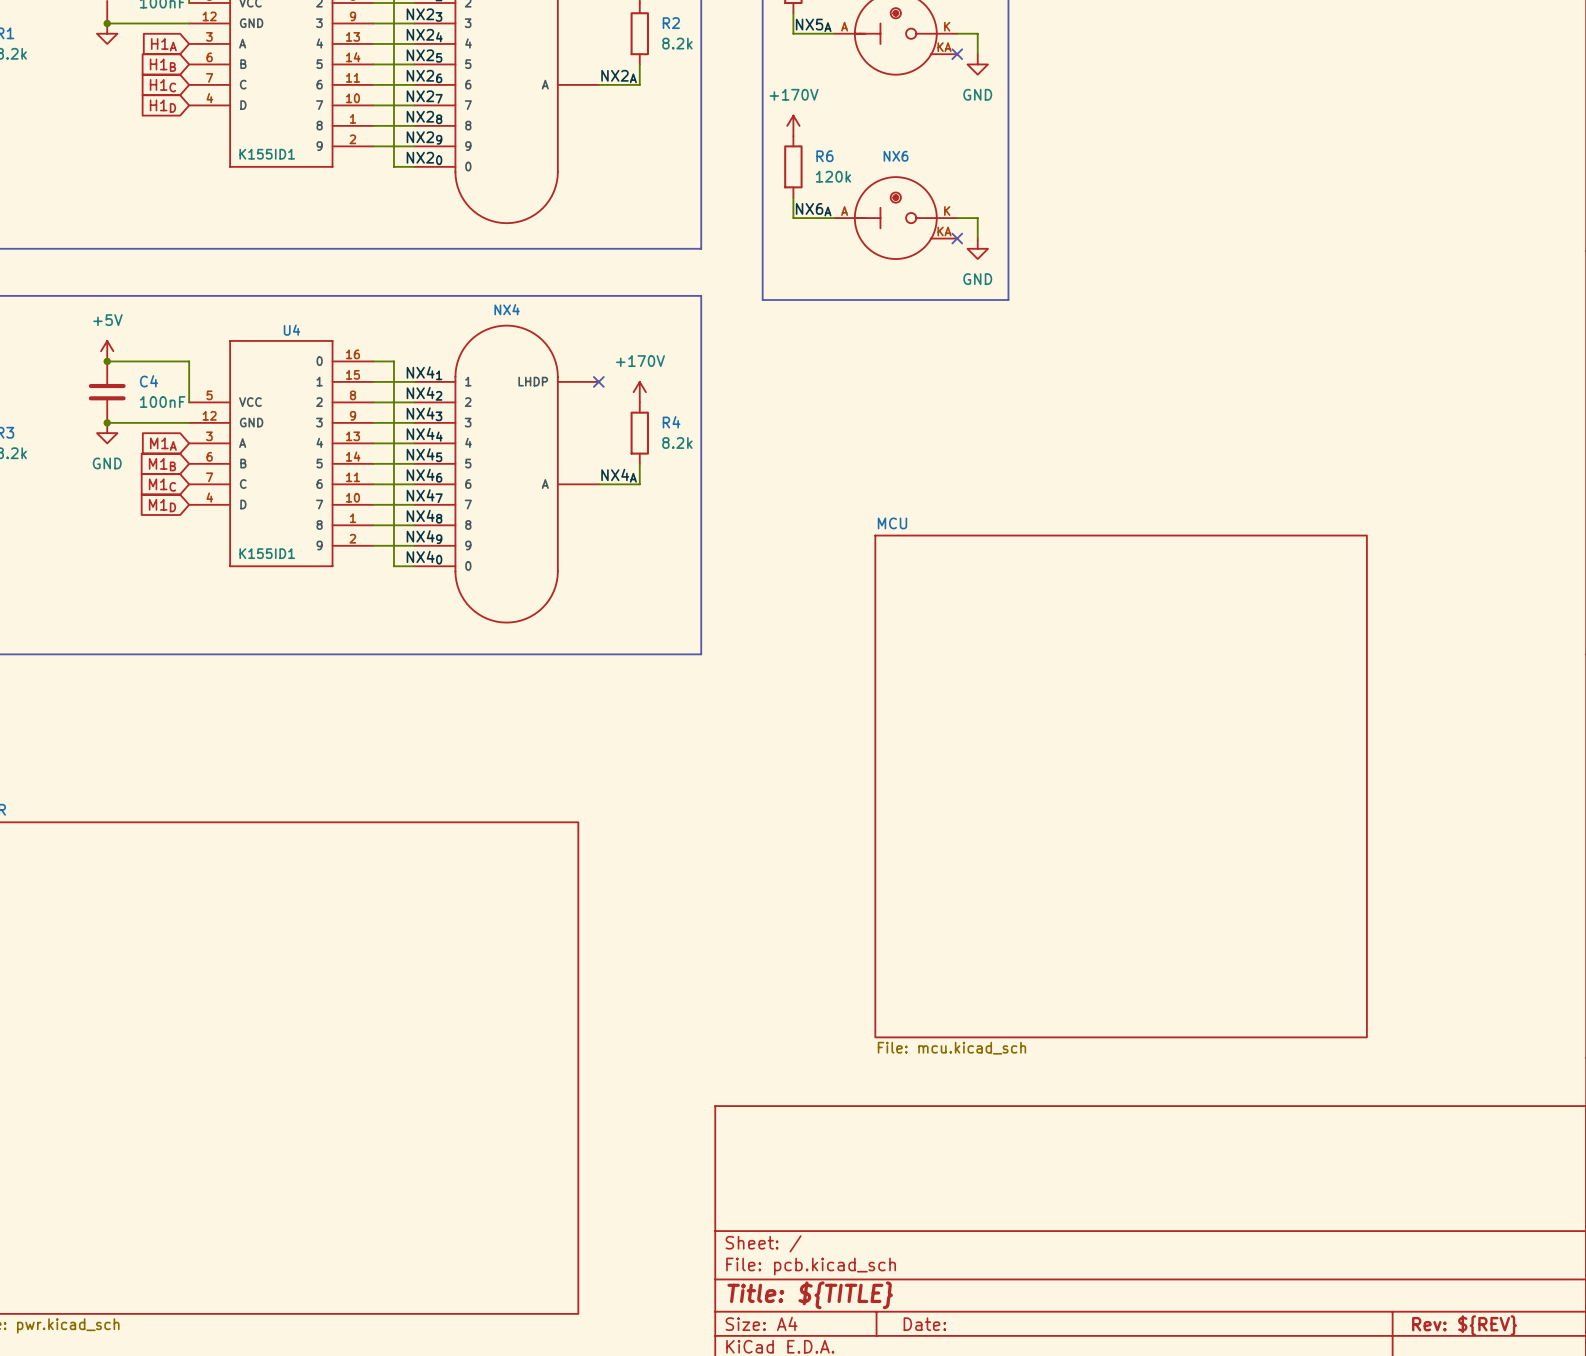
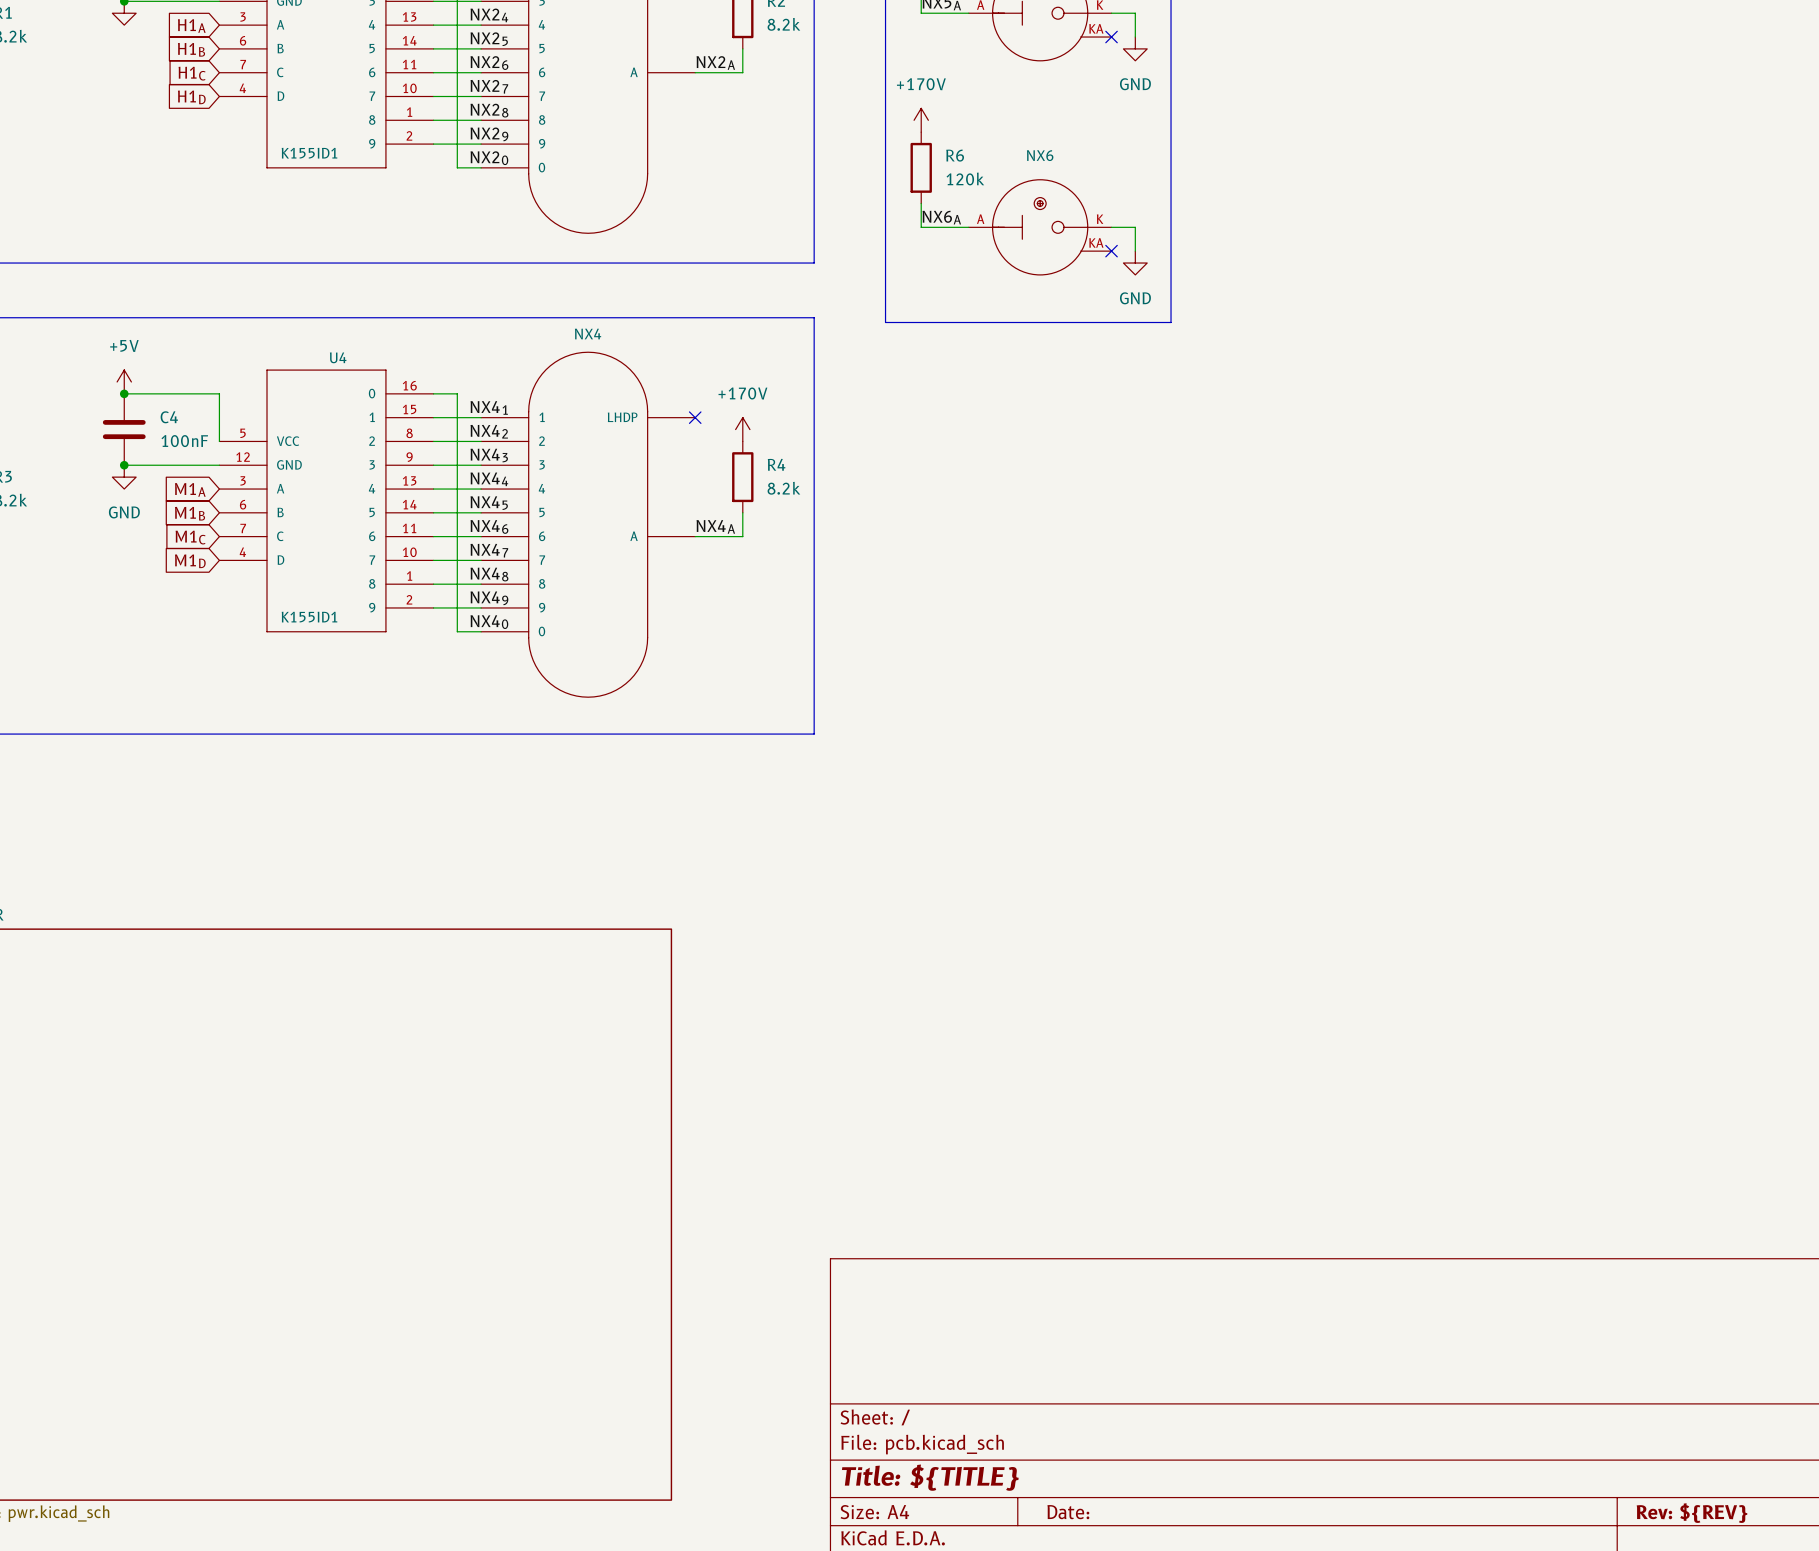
sheet MCU: File: mcu.kicad_sch (1121, 786) -> none

